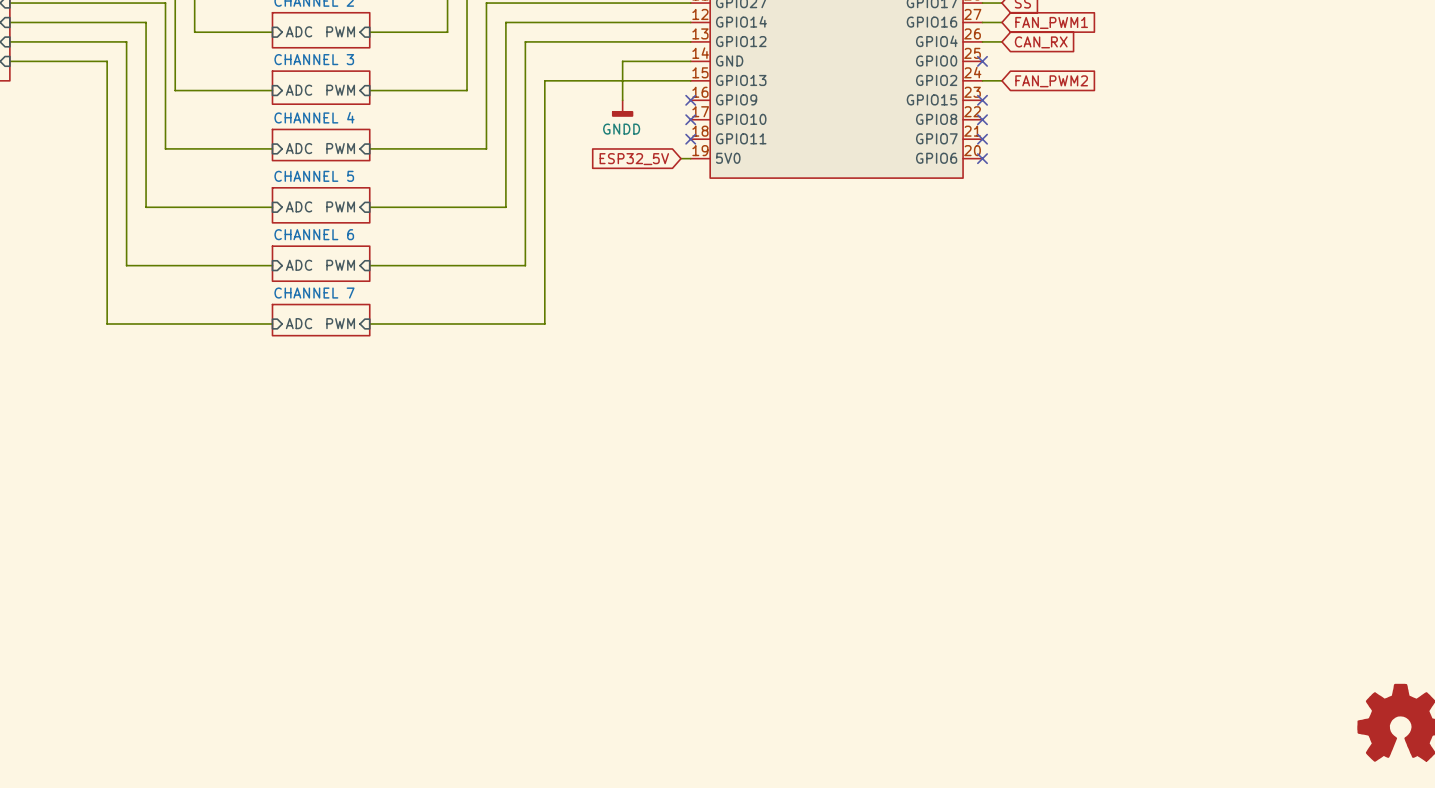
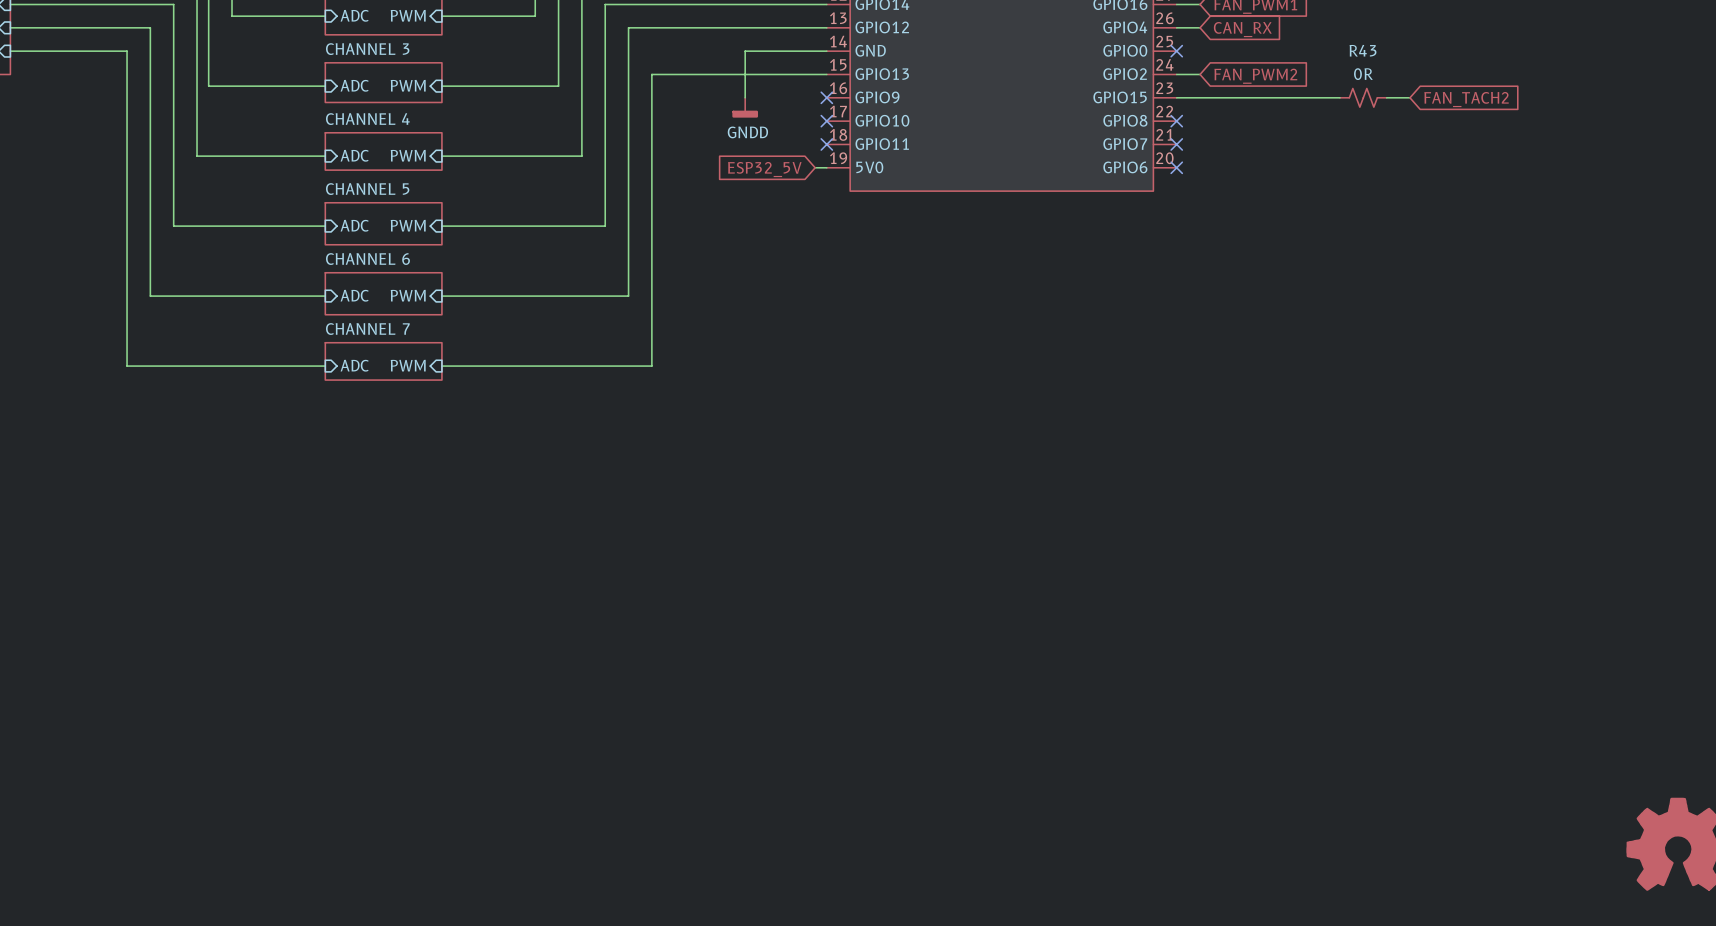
wire: none -> (1176, 97) (1340, 97)
no-connect mark: (982, 100) -> none
R43: none -> 0R (1363, 97)
wire: none -> (1386, 97) (1409, 97)
global label: none -> FAN_TACH2 (1466, 99)

